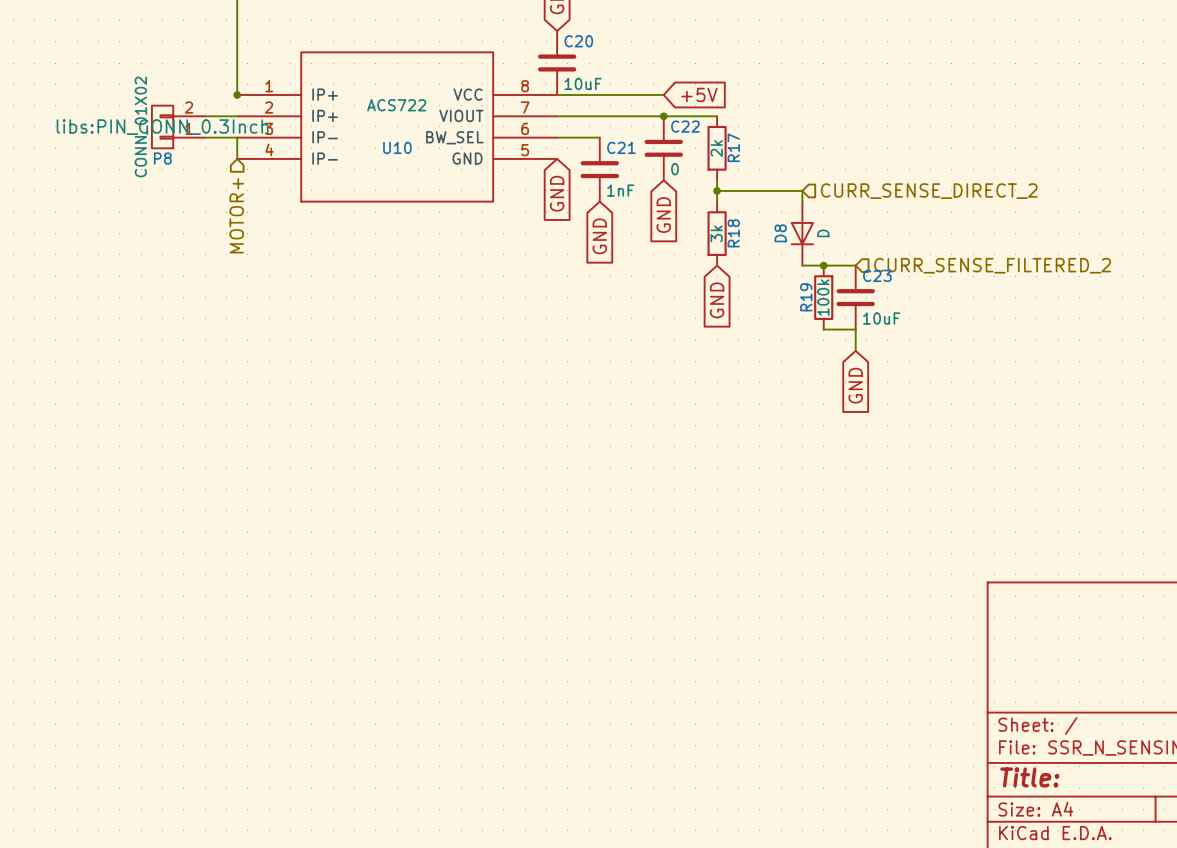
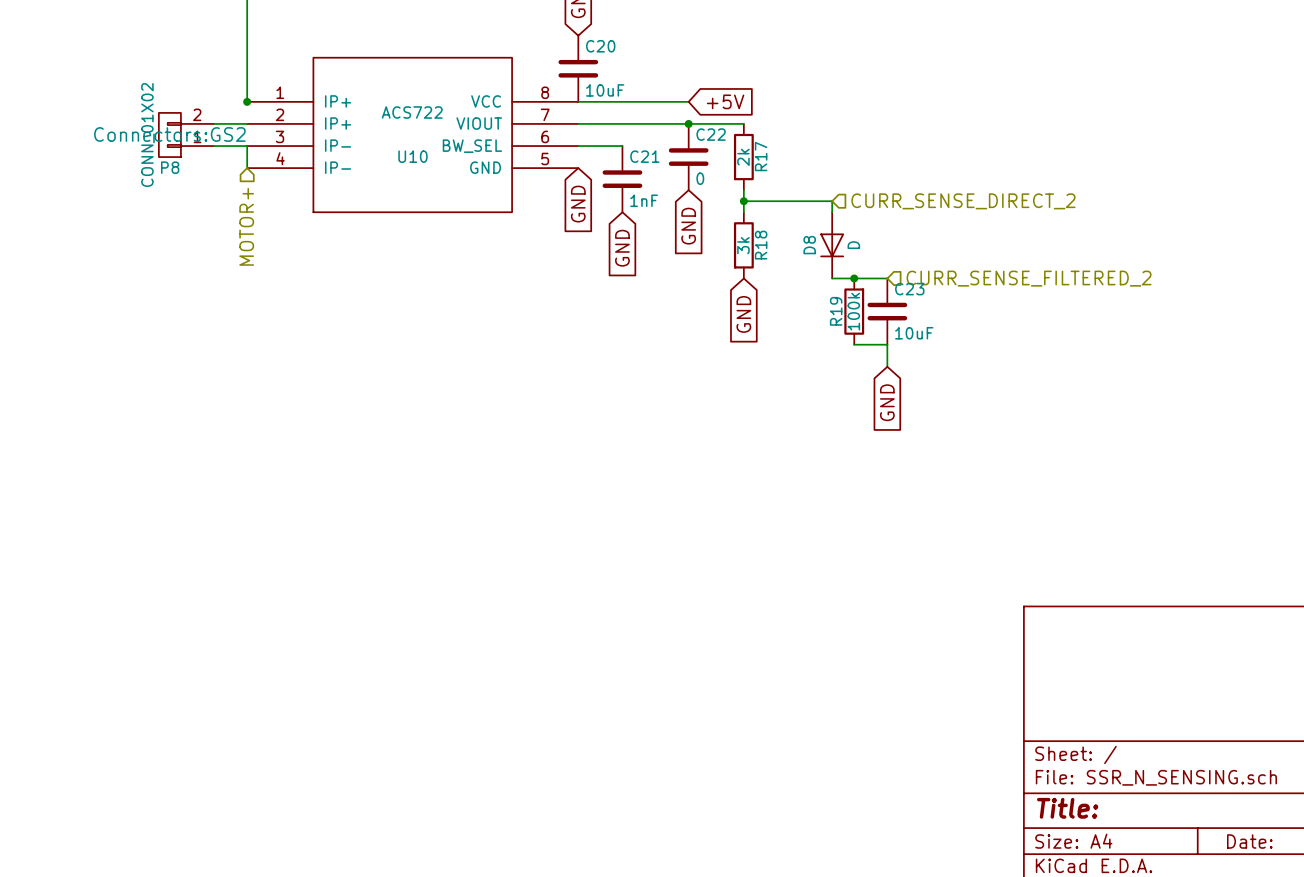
P8 text: libs:PIN_CONN_0.3Inch (162, 127) -> Connectors:GS2 (169, 134)

